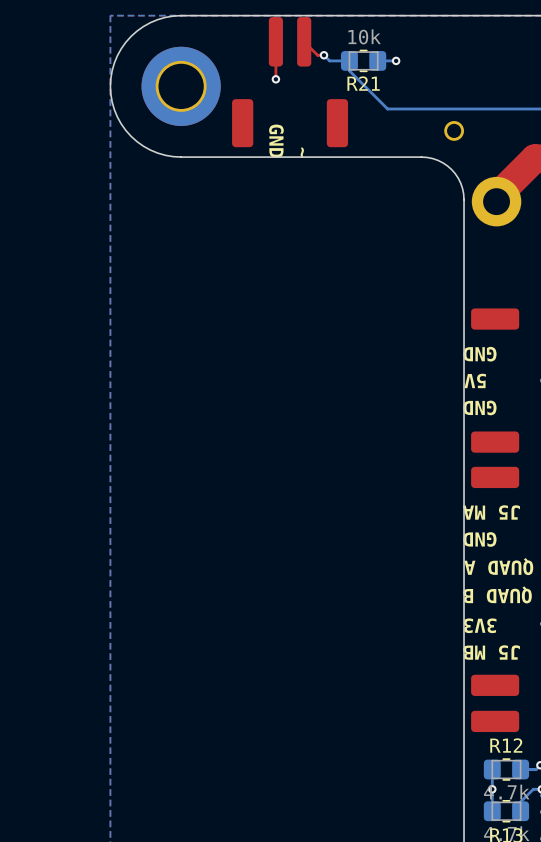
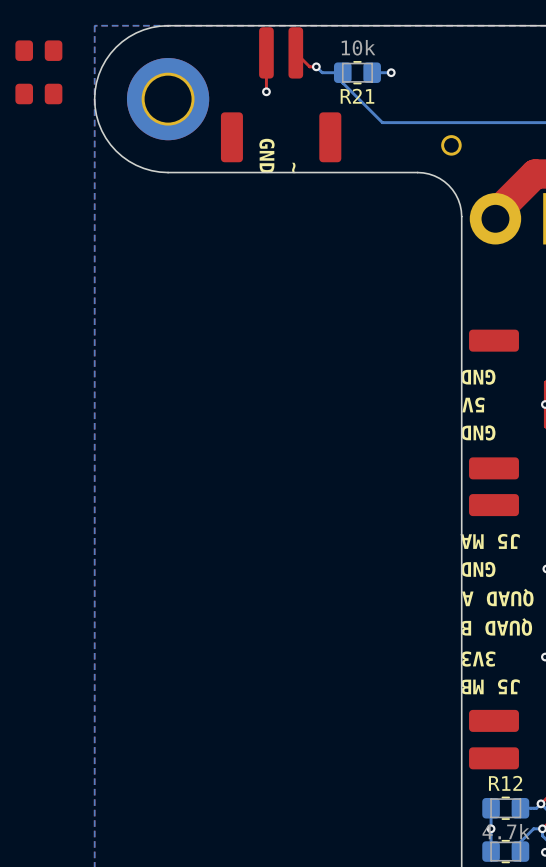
part: none -> (38, 50)
part: none -> (38, 93)

